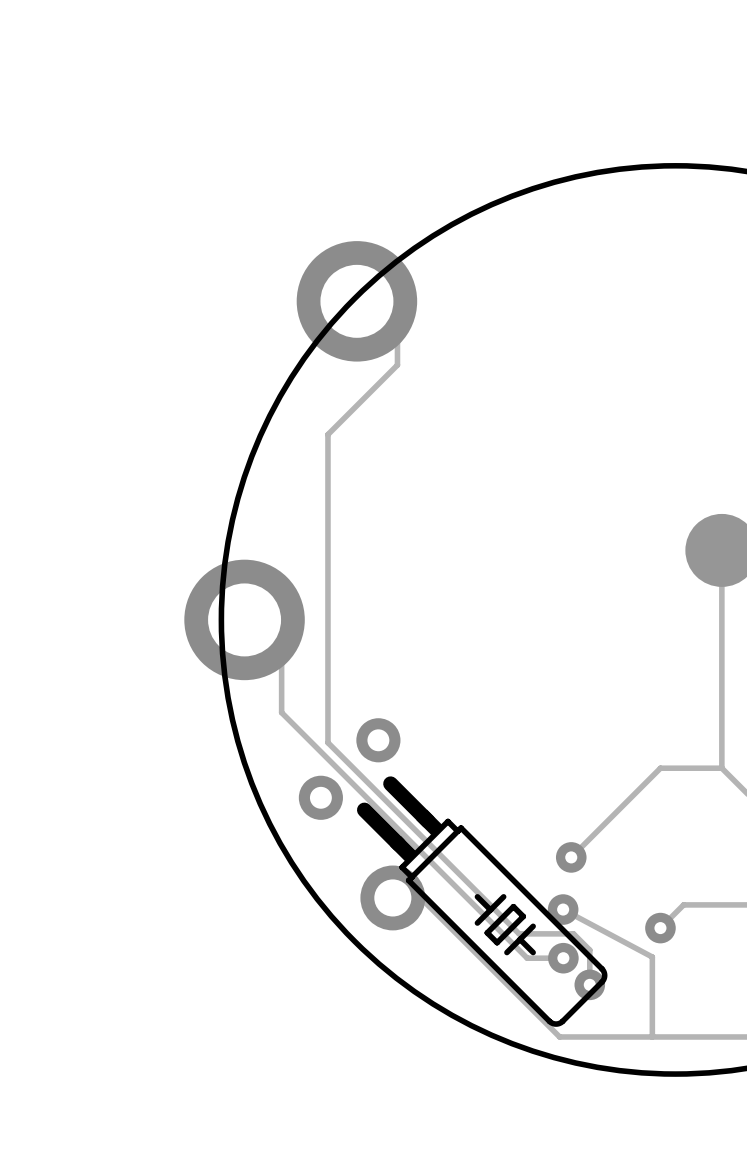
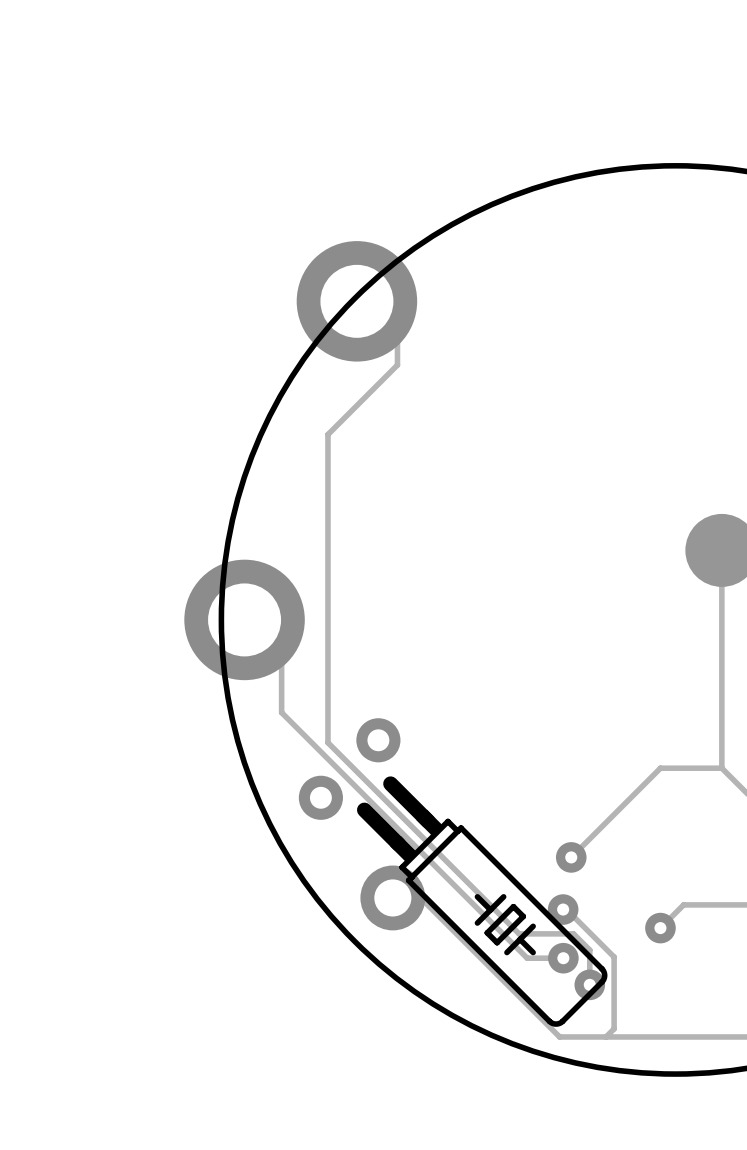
track: (563, 909) (652, 957) (652, 1036) -> (563, 909) (566, 909) (614, 957) (614, 1028) (606, 1036)

